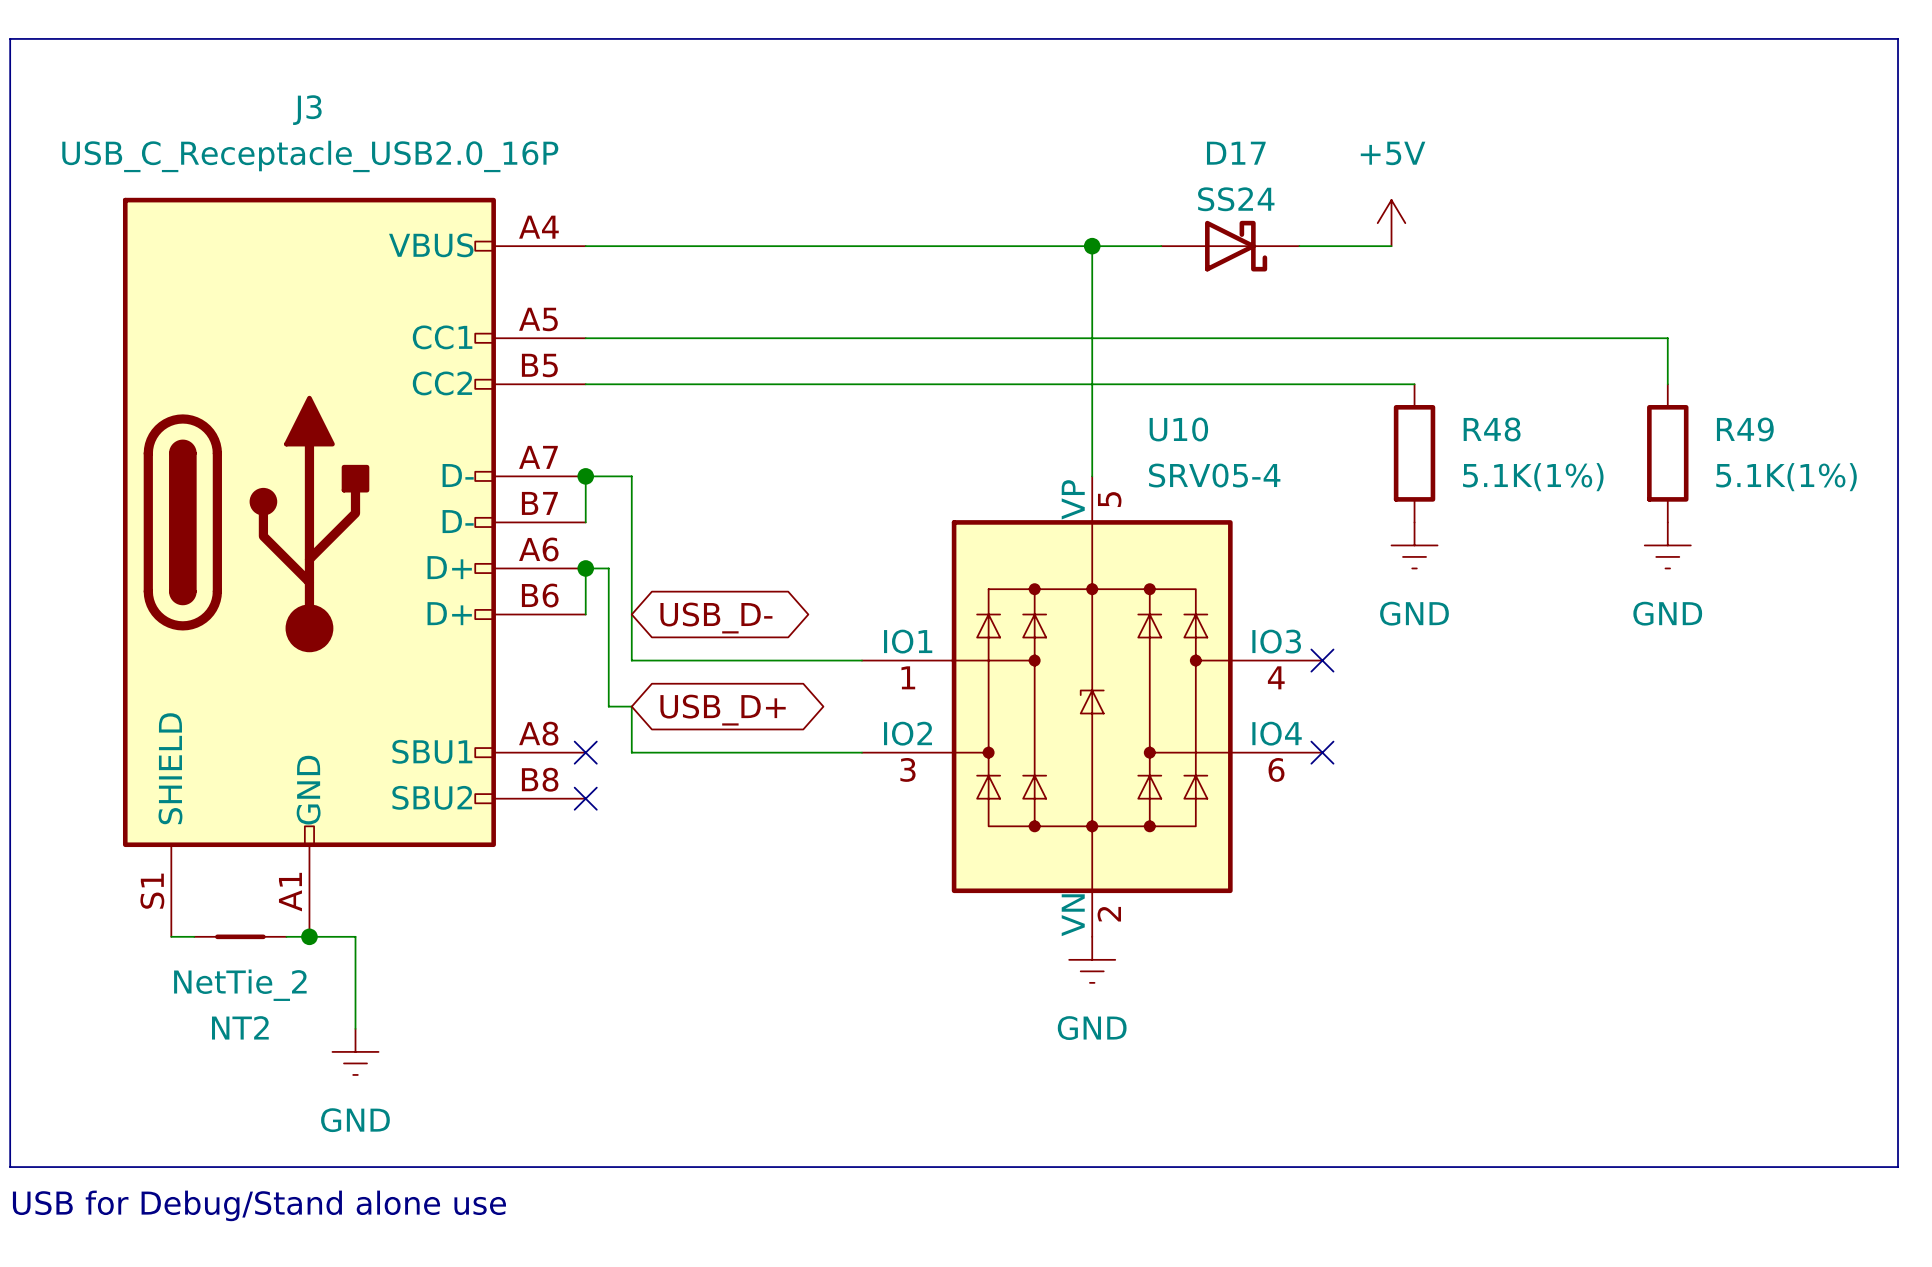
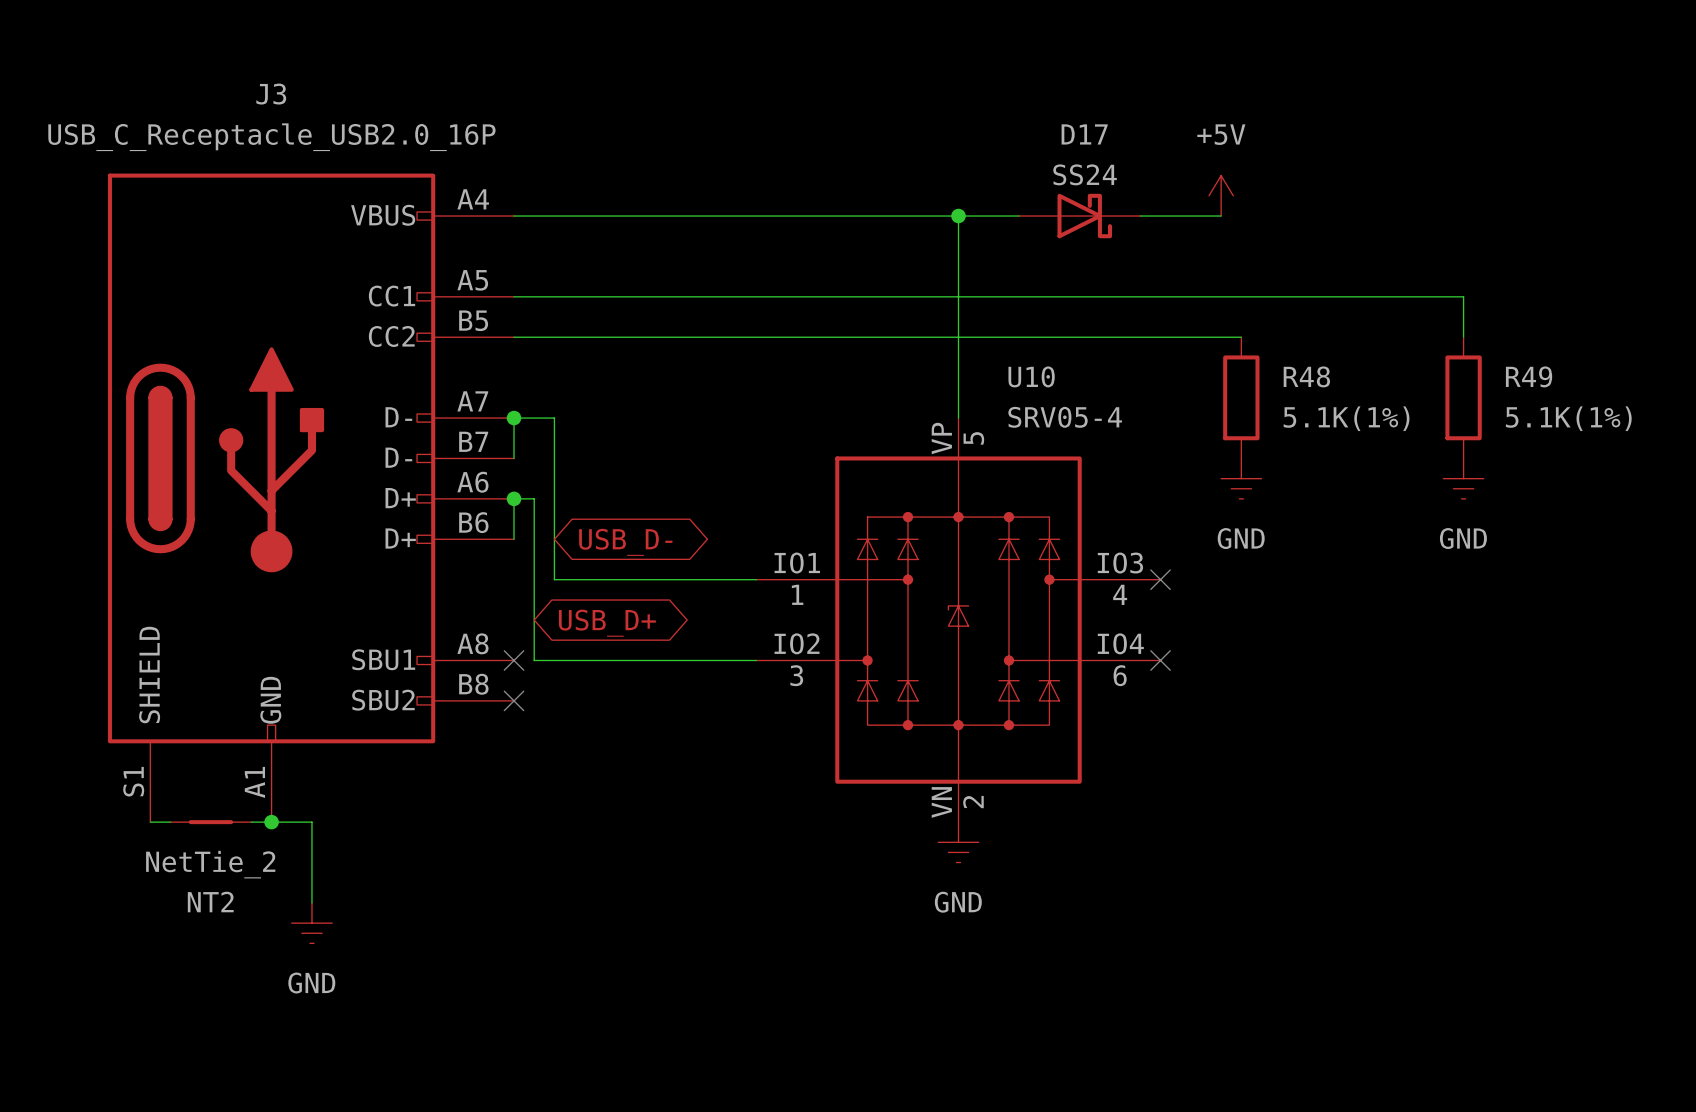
line: (10, 38) (1898, 38) (1898, 1167) (10, 1167) (10, 38) -> none
wire: (608, 706) (631, 706) (631, 752) -> (534, 620) (534, 660) (554, 660)
global label position: USB_D+ (723, 710) -> USB_D+ (607, 623)
text: USB for Debug/Stand alone use (259, 1205) -> none

